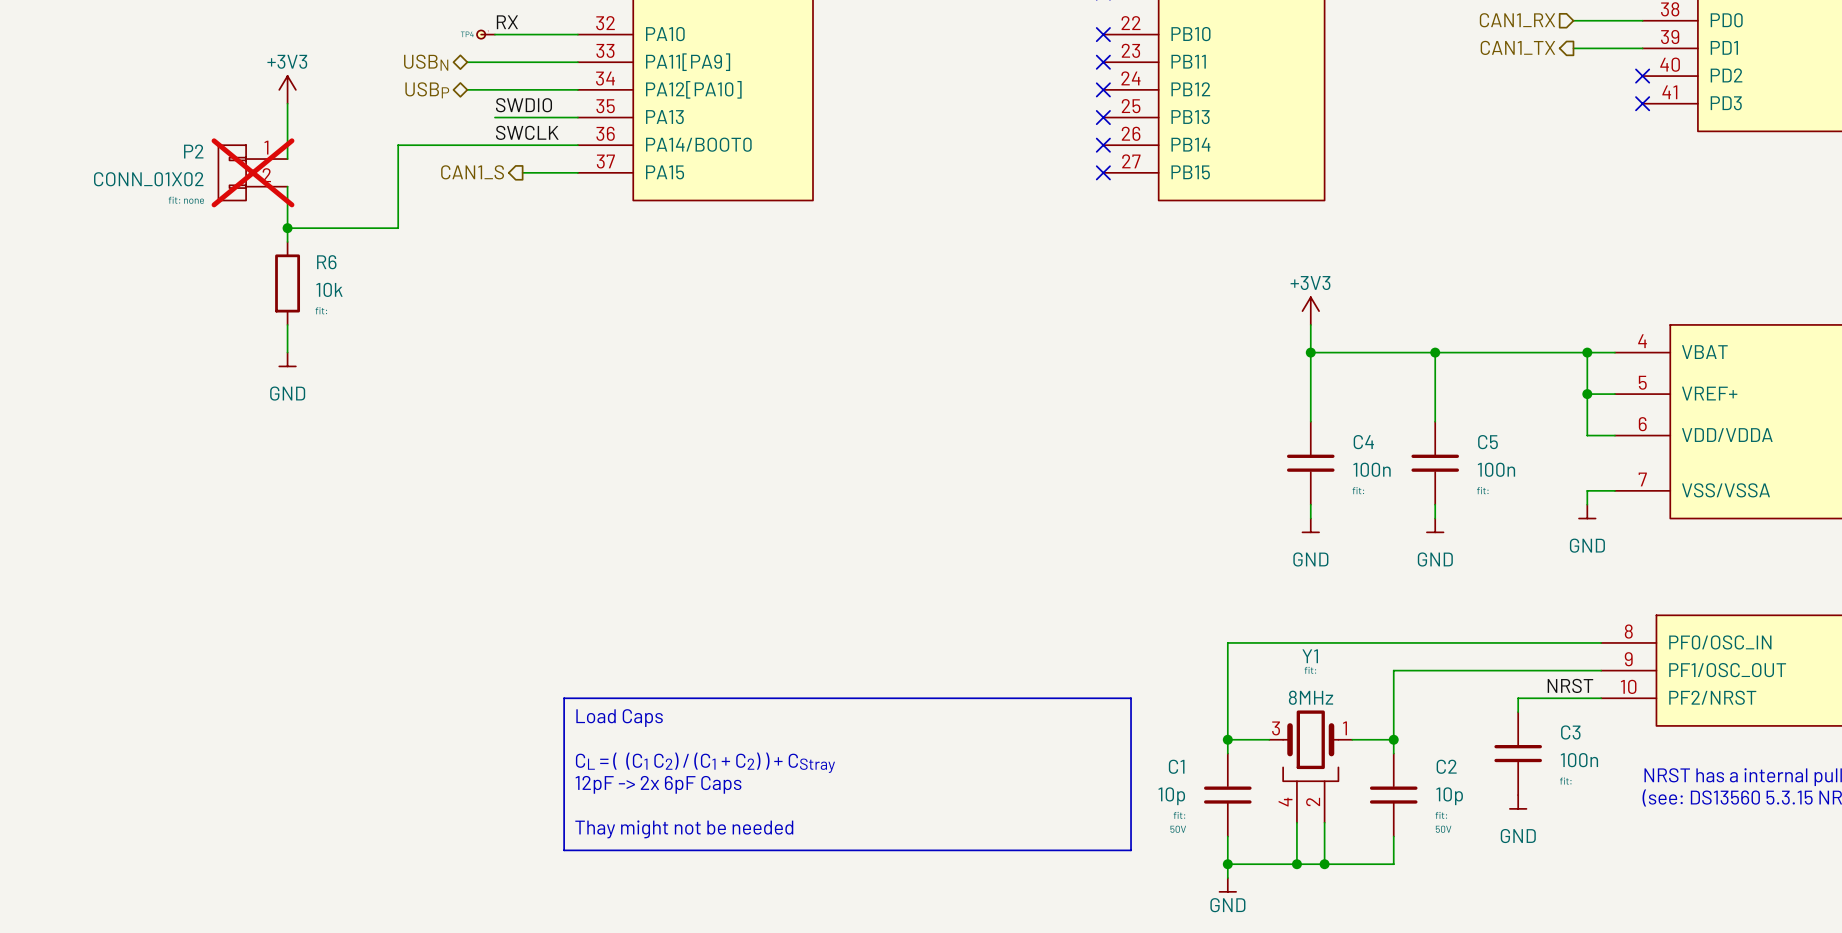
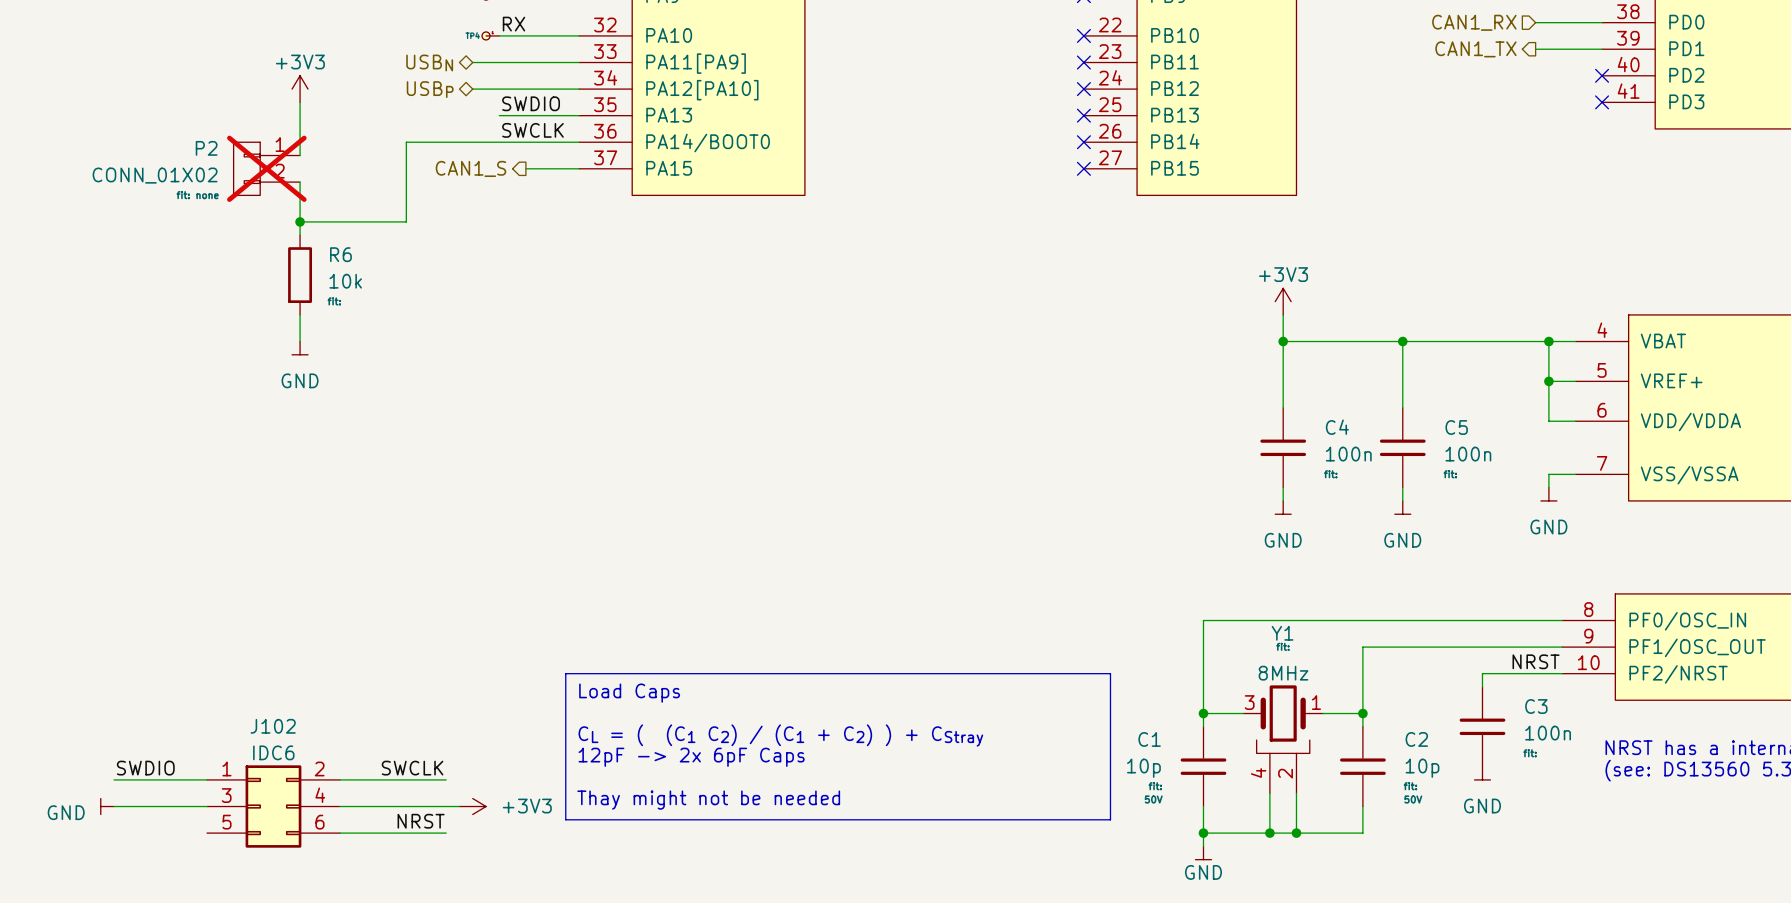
label: none -> SWDIO (145, 768)
label: none -> SWCLK (412, 768)
wire: none -> (114, 779) (207, 779)
wire: none -> (339, 779) (446, 779)
power symbol: none -> GND (107, 806)
wire: none -> (114, 806) (207, 806)
J102: none -> IDC6 (273, 806)
wire: none -> (339, 806) (459, 806)
power symbol: none -> +3V3 (472, 806)
label: none -> NRST (421, 821)
wire: none -> (339, 833) (446, 833)

